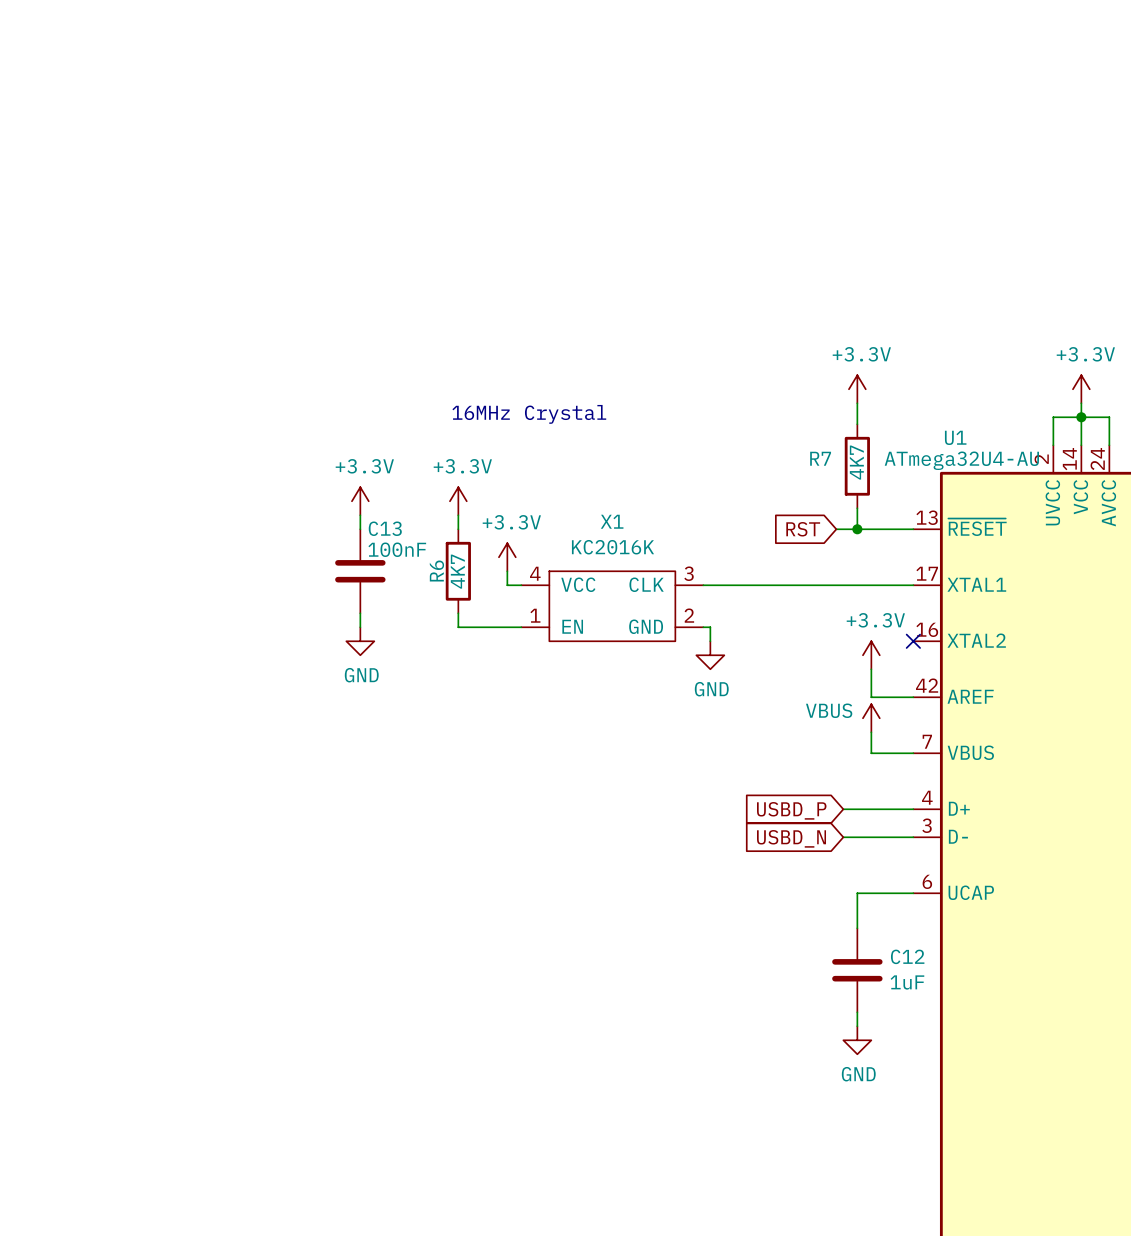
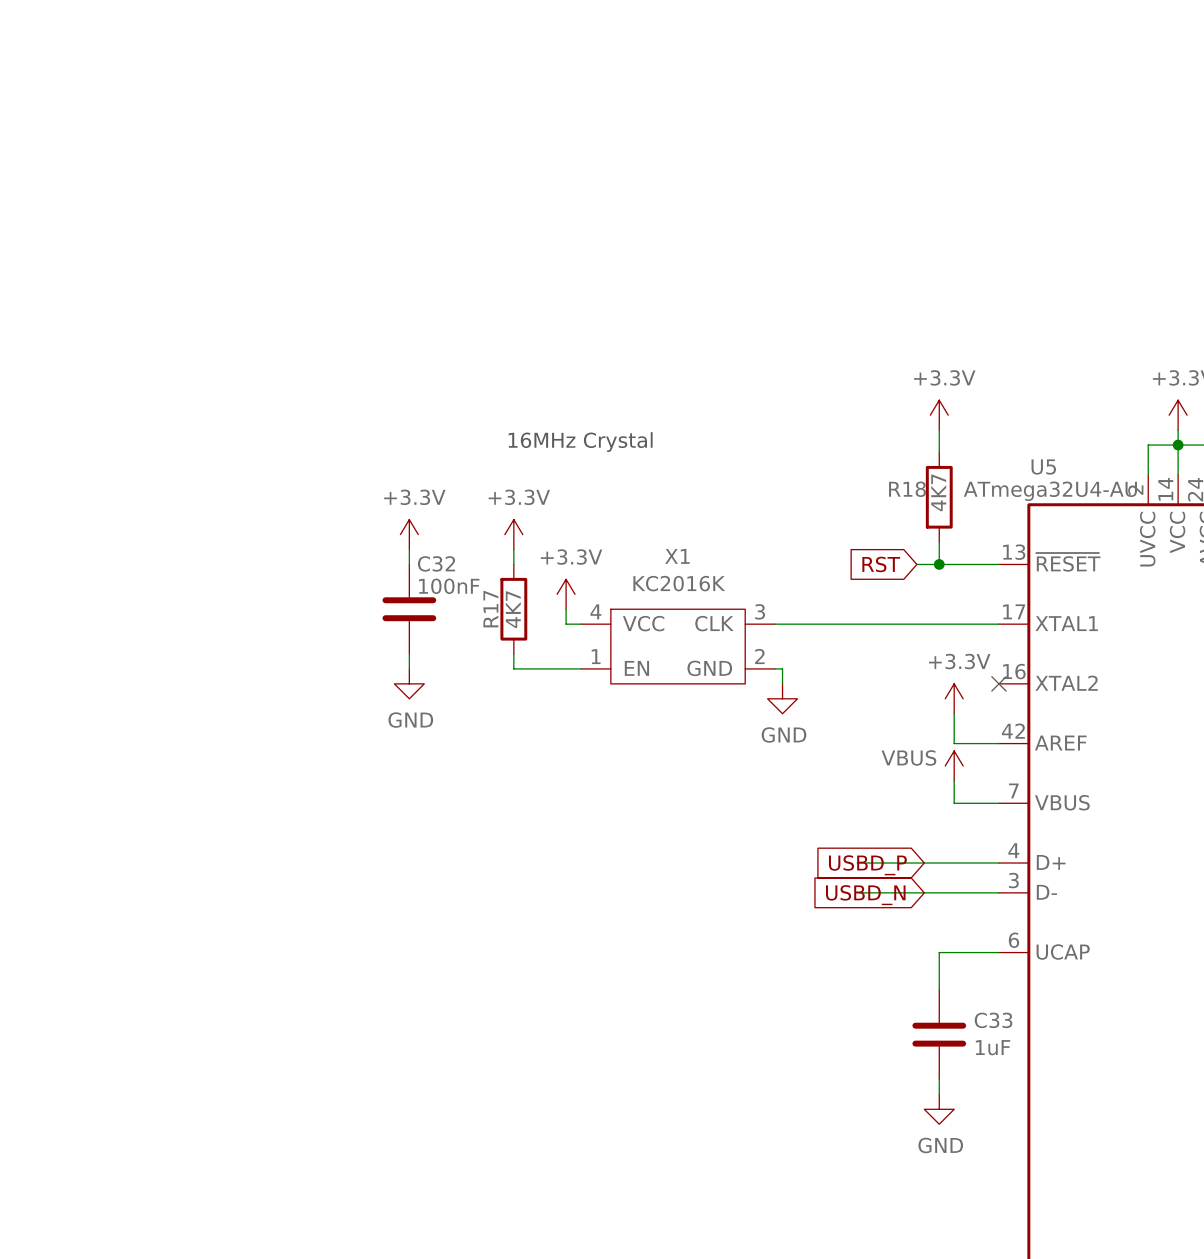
U1 name: U1 (955, 437) -> U5 (1043, 467)
R7 name: R7 (820, 458) -> R18 (907, 489)
C13 name: C13 (385, 528) -> C32 (436, 563)
R6 name: R6 (436, 571) -> R17 (490, 609)
wire: none -> (857, 863) (924, 863)
wire: none -> (857, 892) (924, 892)
C12 name: C12 (907, 956) -> C33 (993, 1020)

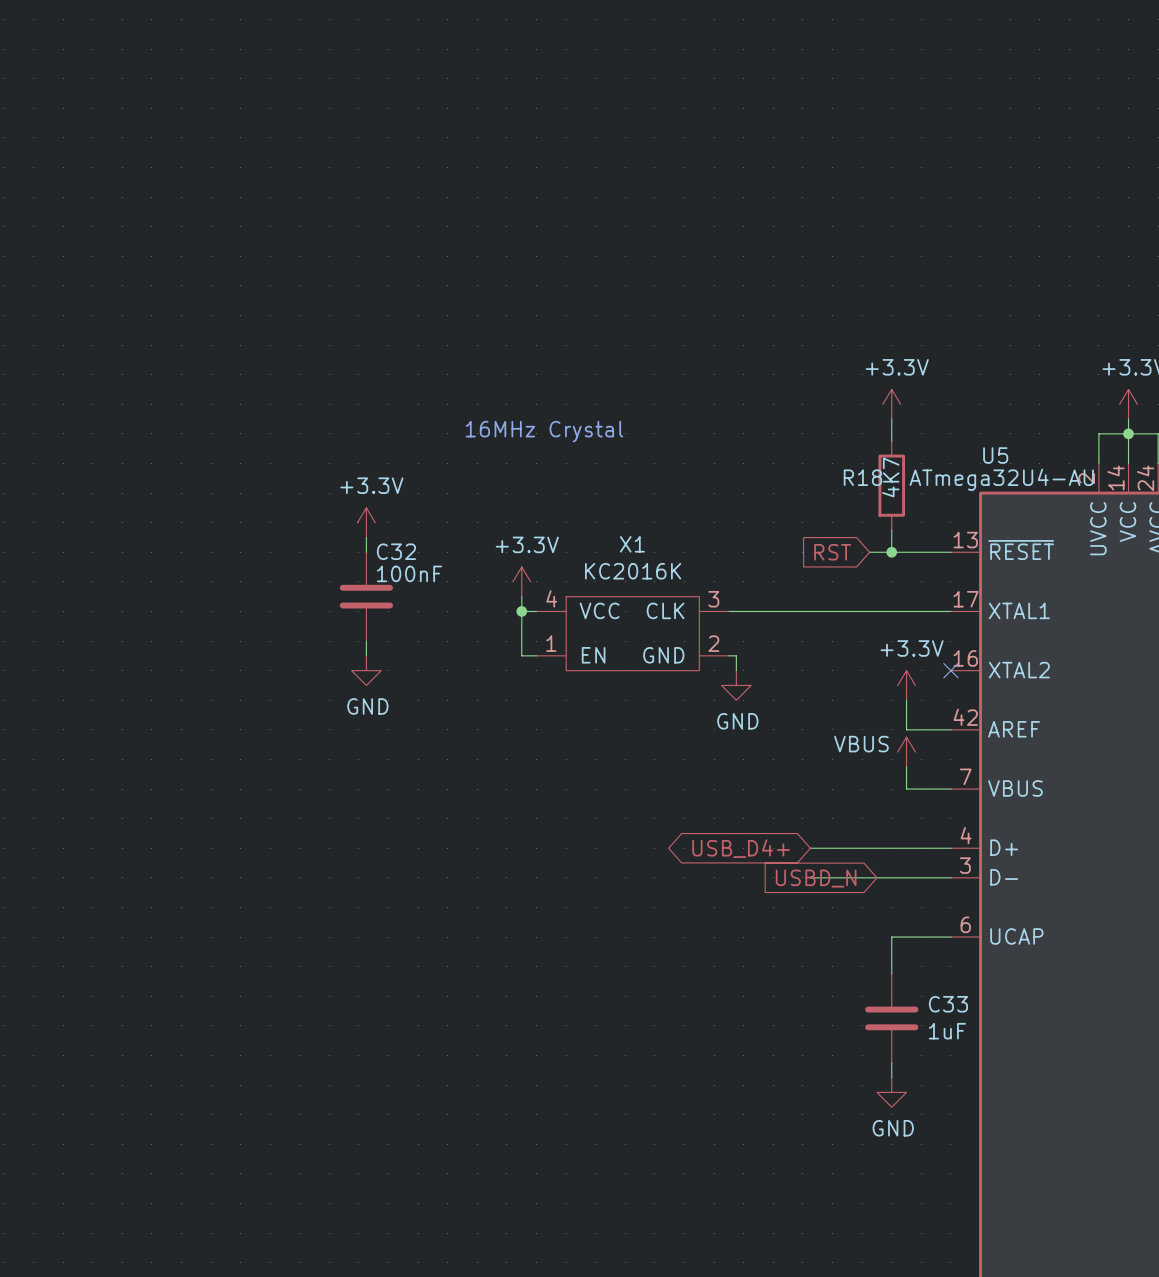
power symbol: +3.3V (513, 534) -> none
wire: (513, 549) (513, 564) -> none
R17: 4K7 (513, 609) -> none
junction: none -> (521, 611)
wire: (513, 654) (513, 668) (566, 668) -> (521, 611) (521, 655)
global label shape: input (867, 865) -> bidirectional (741, 848)
global label: USBD_P (867, 865) -> USB_D4+ (741, 848)

